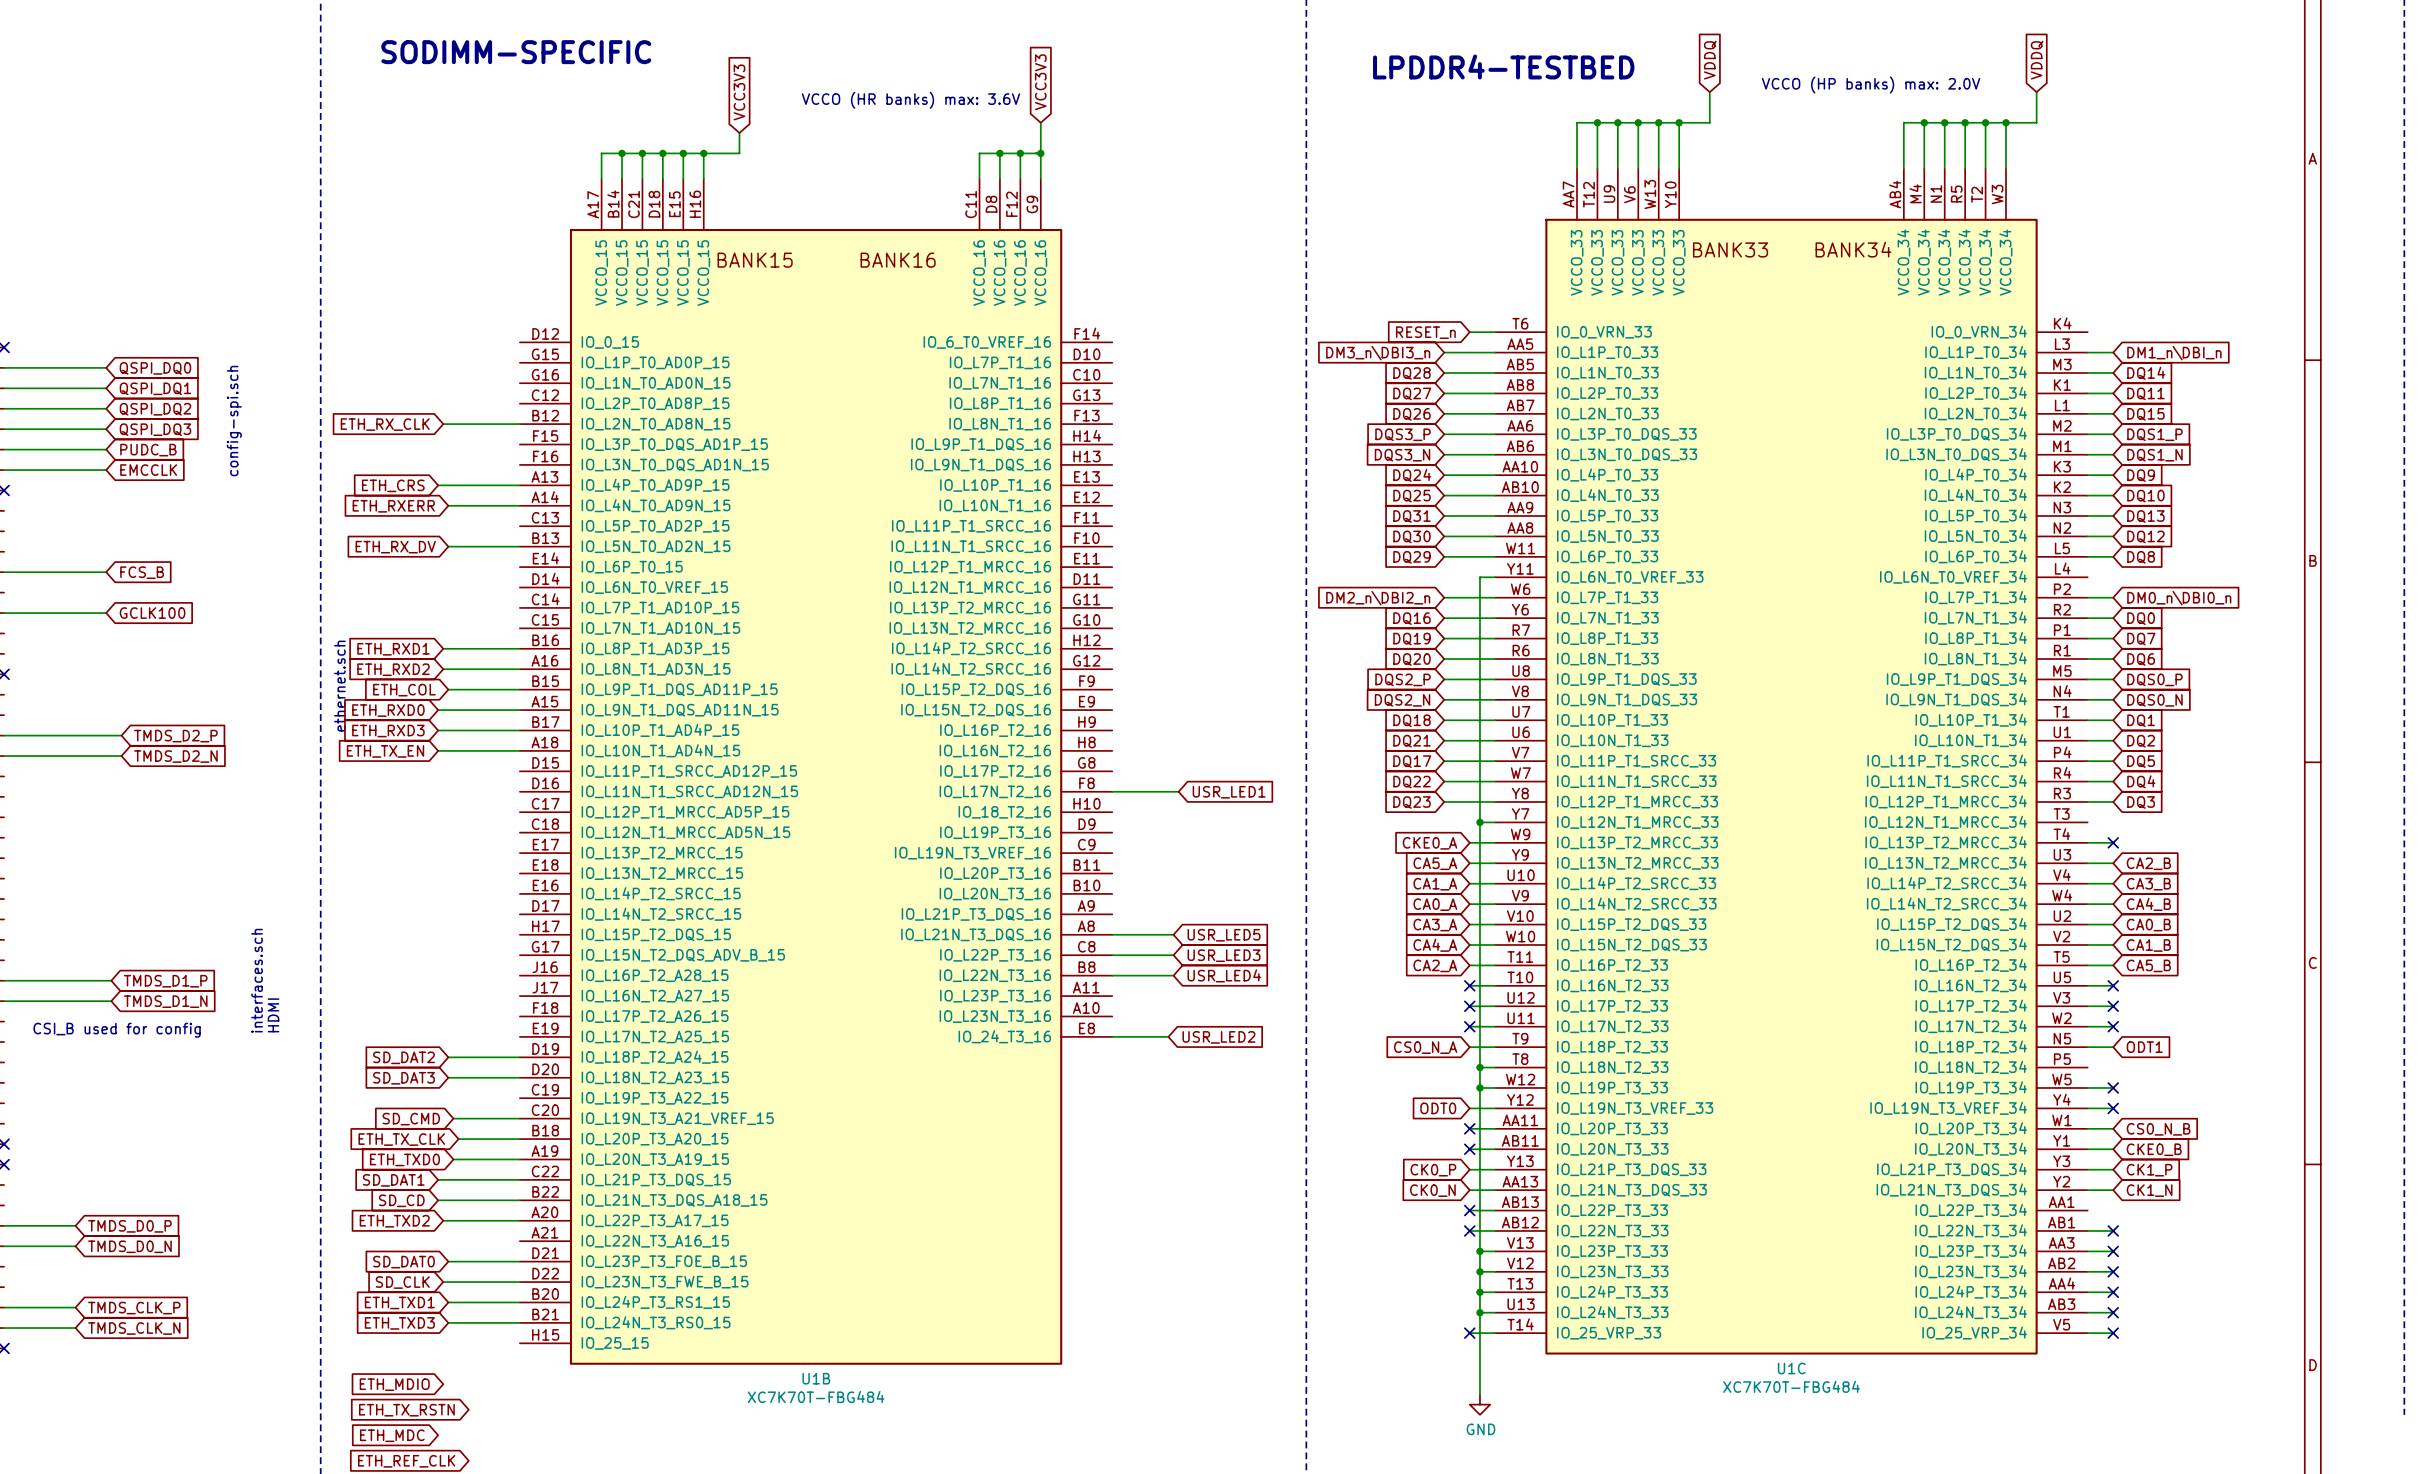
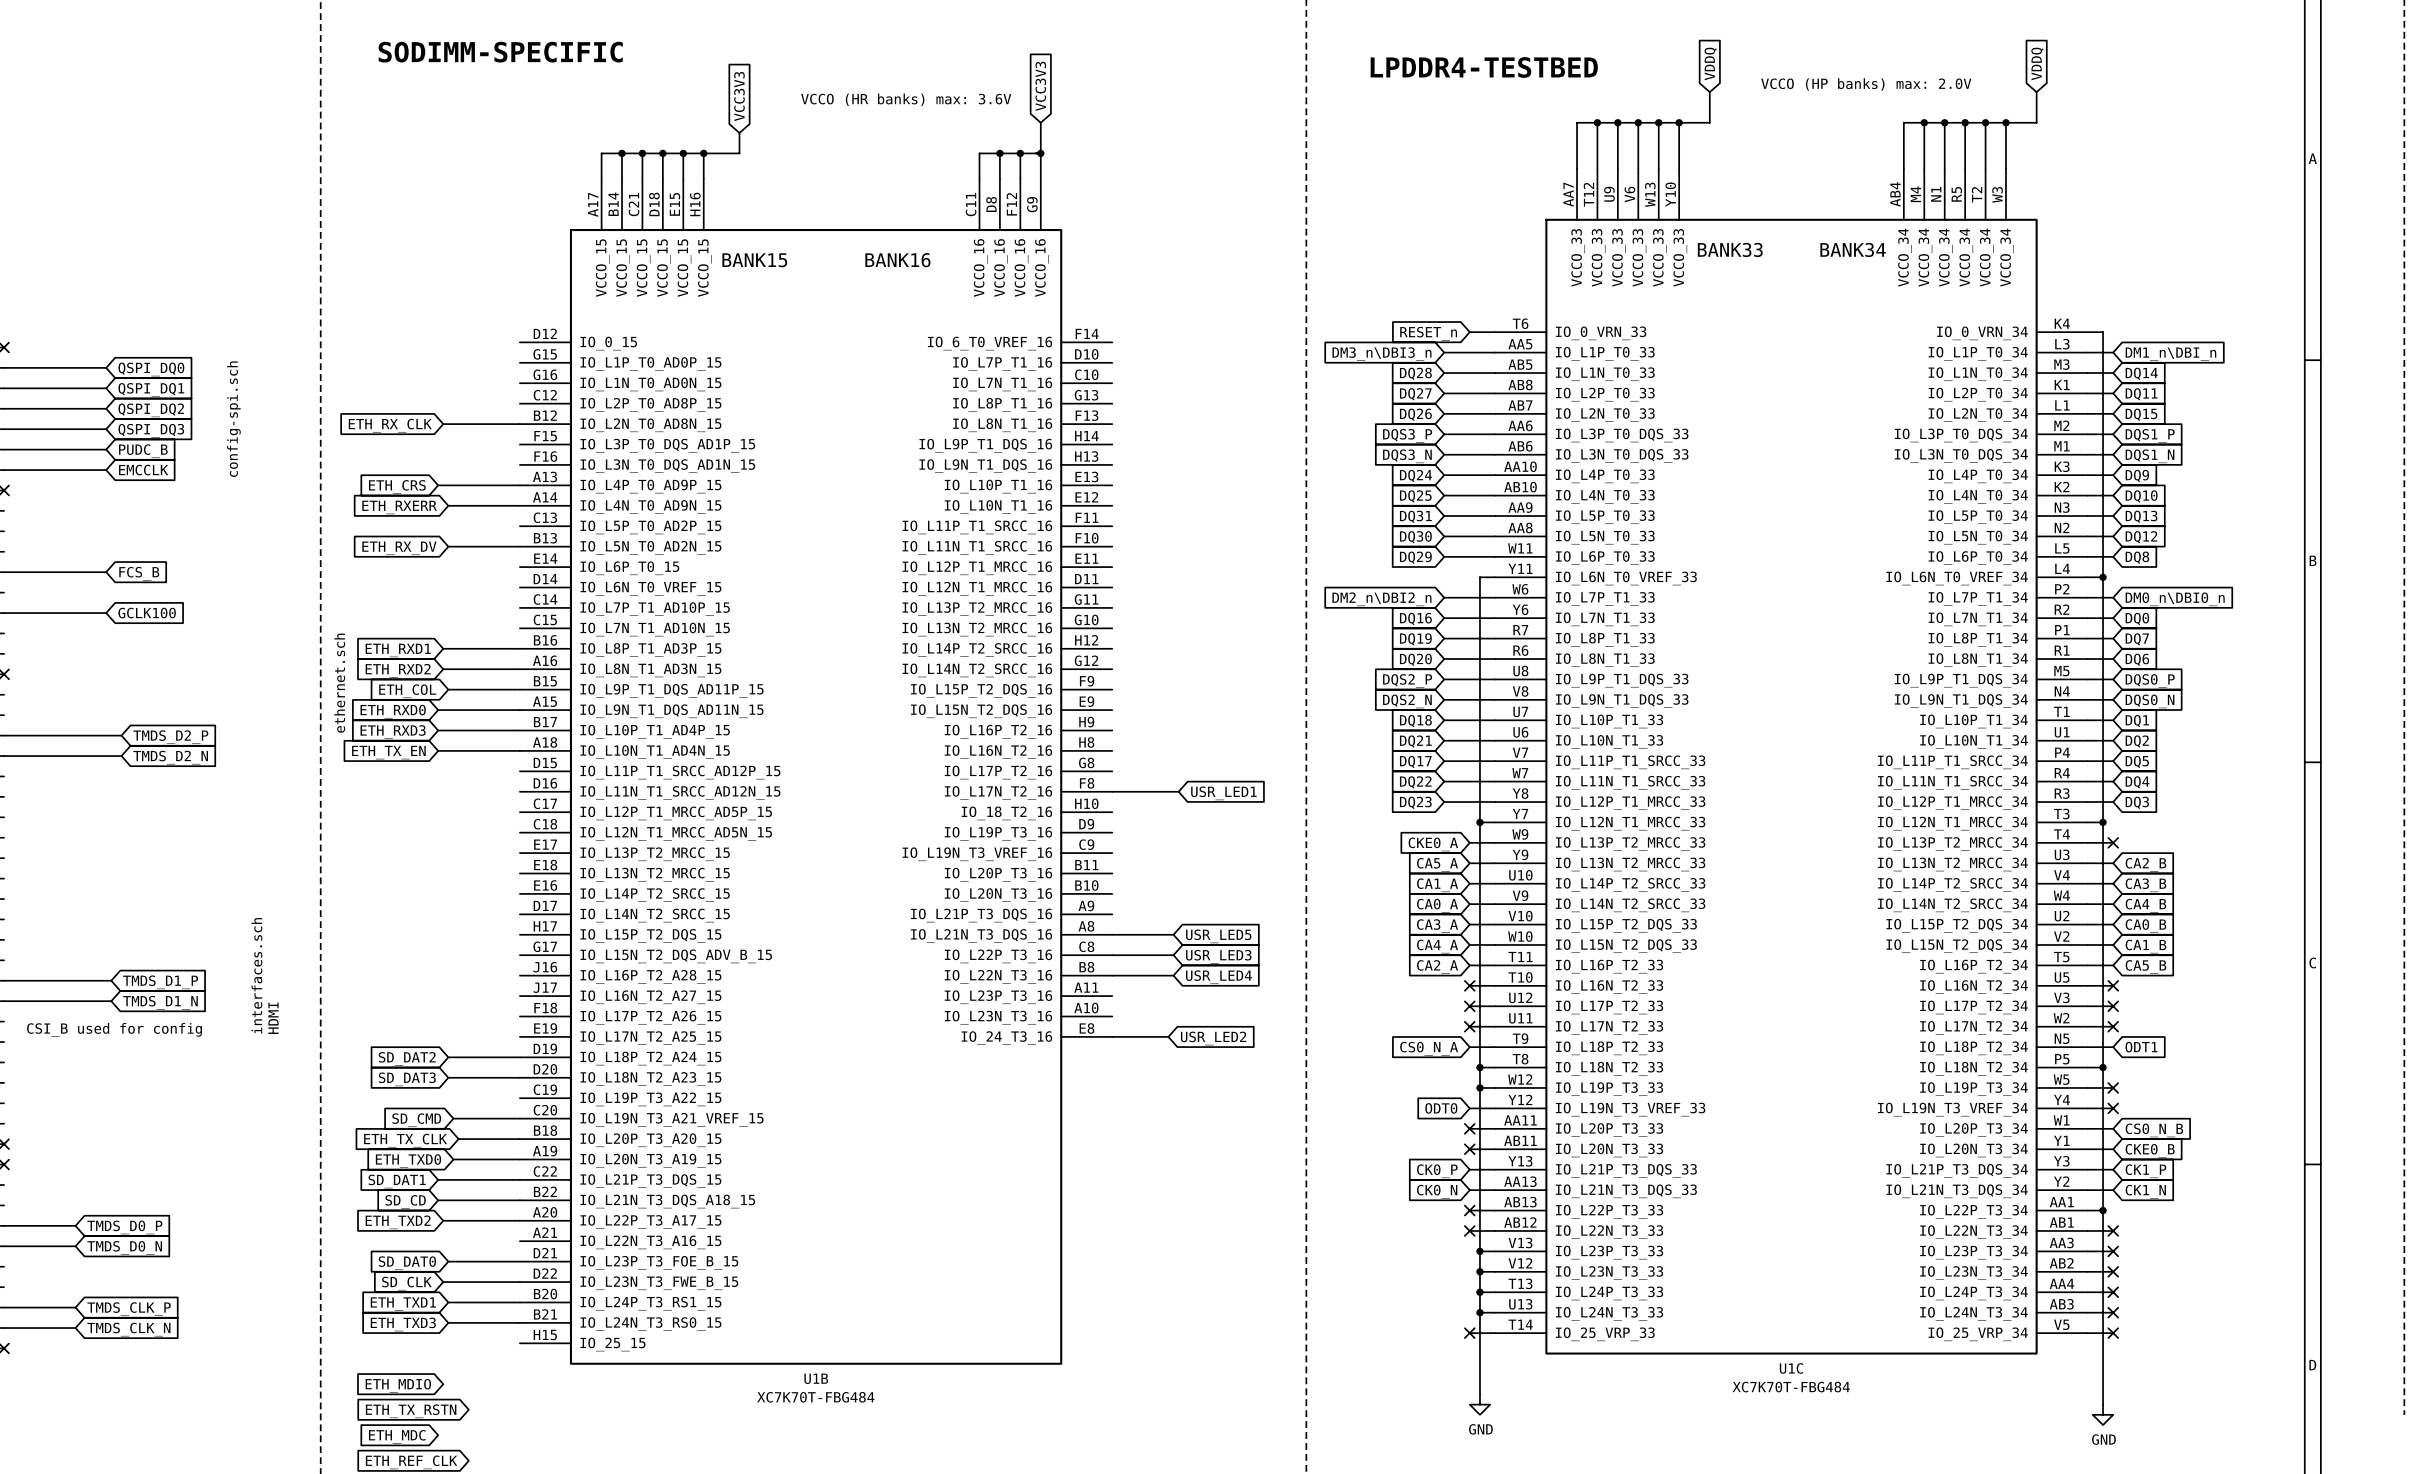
wire: none -> (2087, 332) (2103, 332) (2103, 1404)
wire: none -> (2087, 577) (2103, 577)
junction: none -> (2103, 577)
wire: none -> (2087, 822) (2103, 822)
junction: none -> (2103, 822)
wire: none -> (2087, 1067) (2103, 1067)
junction: none -> (2103, 1067)
wire: none -> (2087, 1210) (2103, 1210)
junction: none -> (2103, 1210)
power symbol: none -> GND (2103, 1414)

